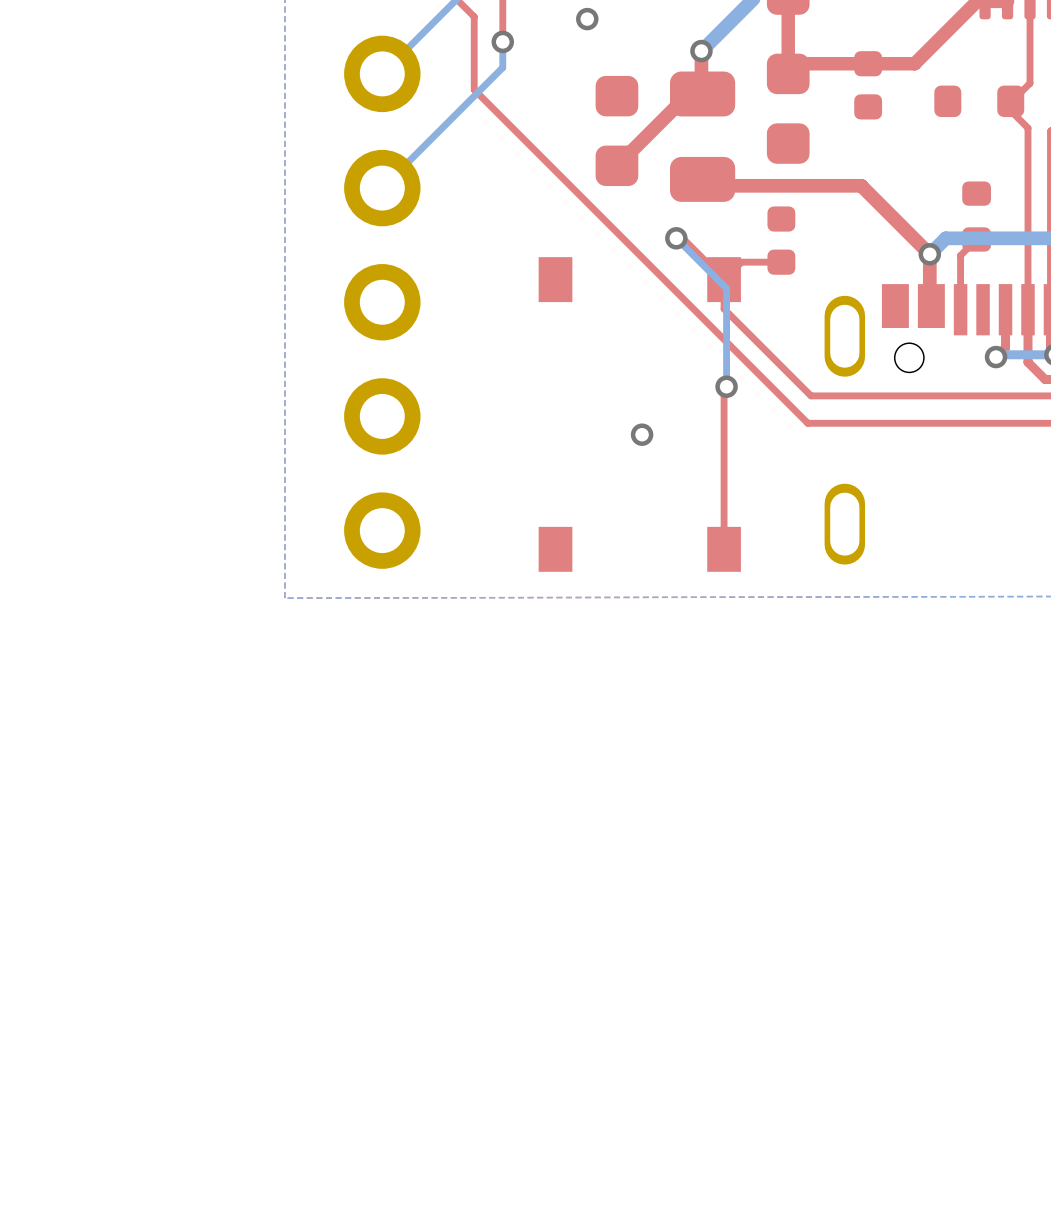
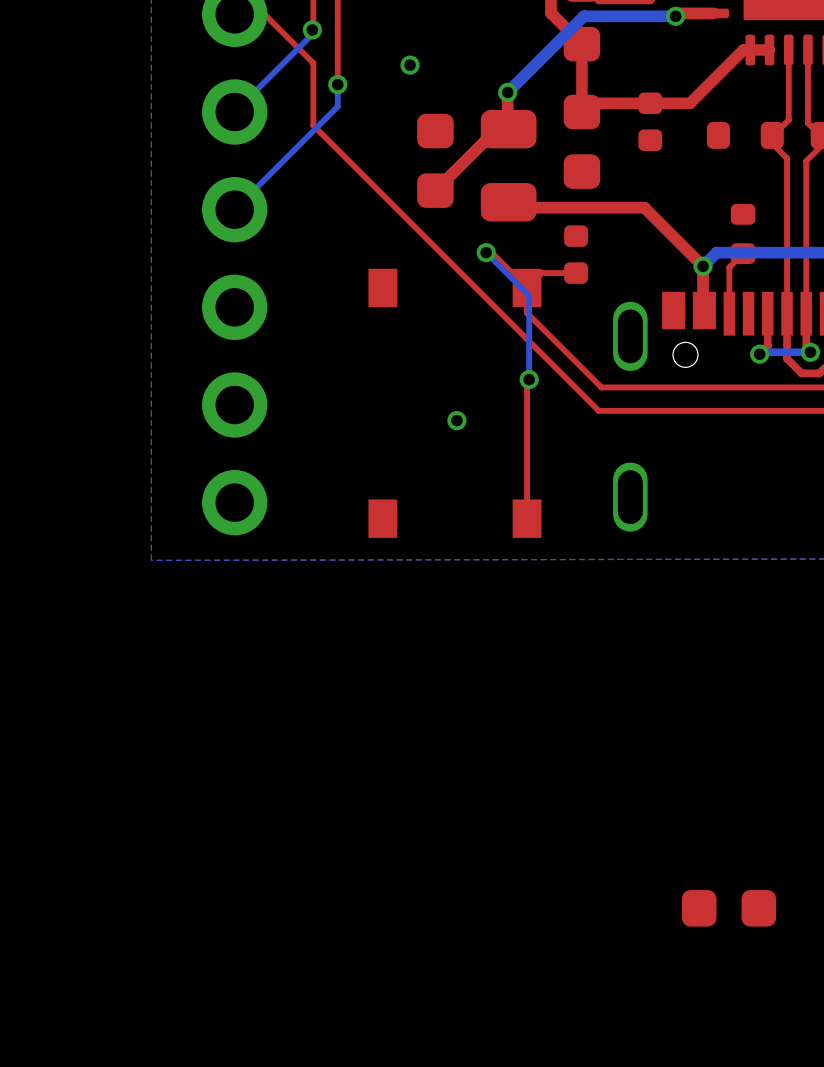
part: none -> (729, 908)

